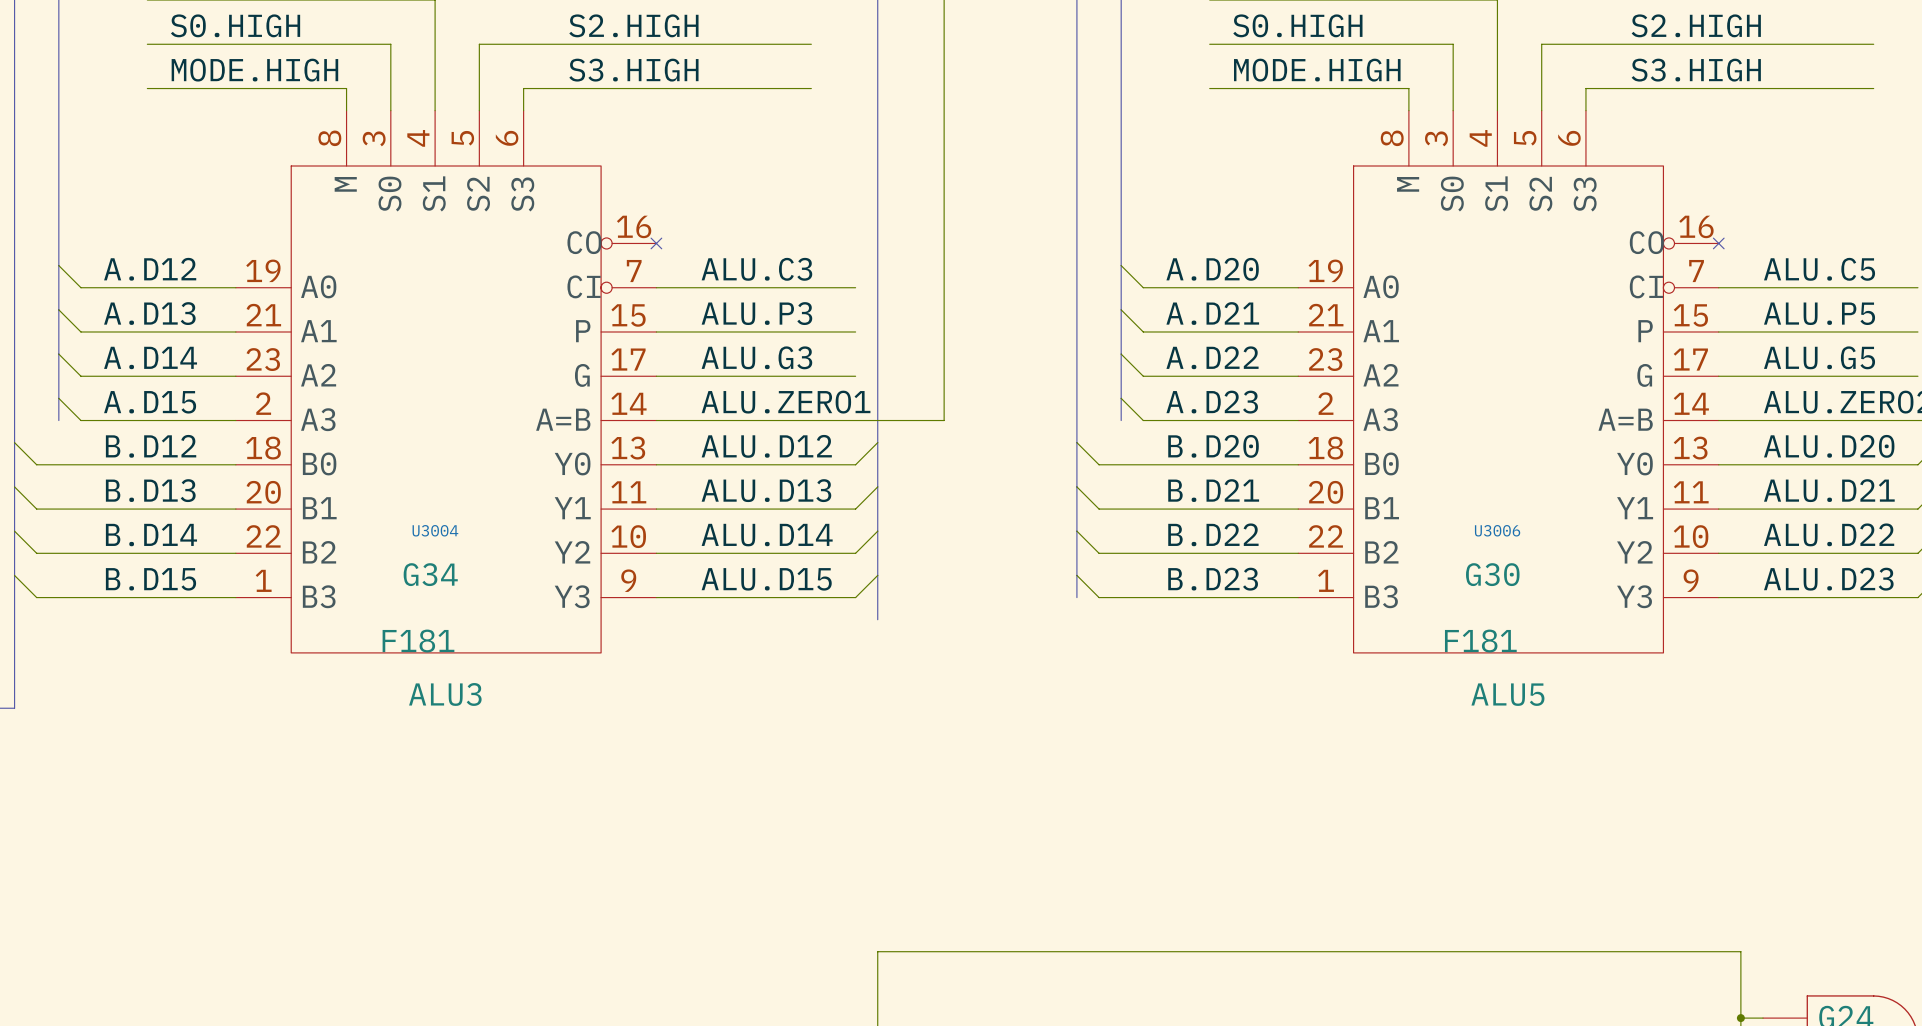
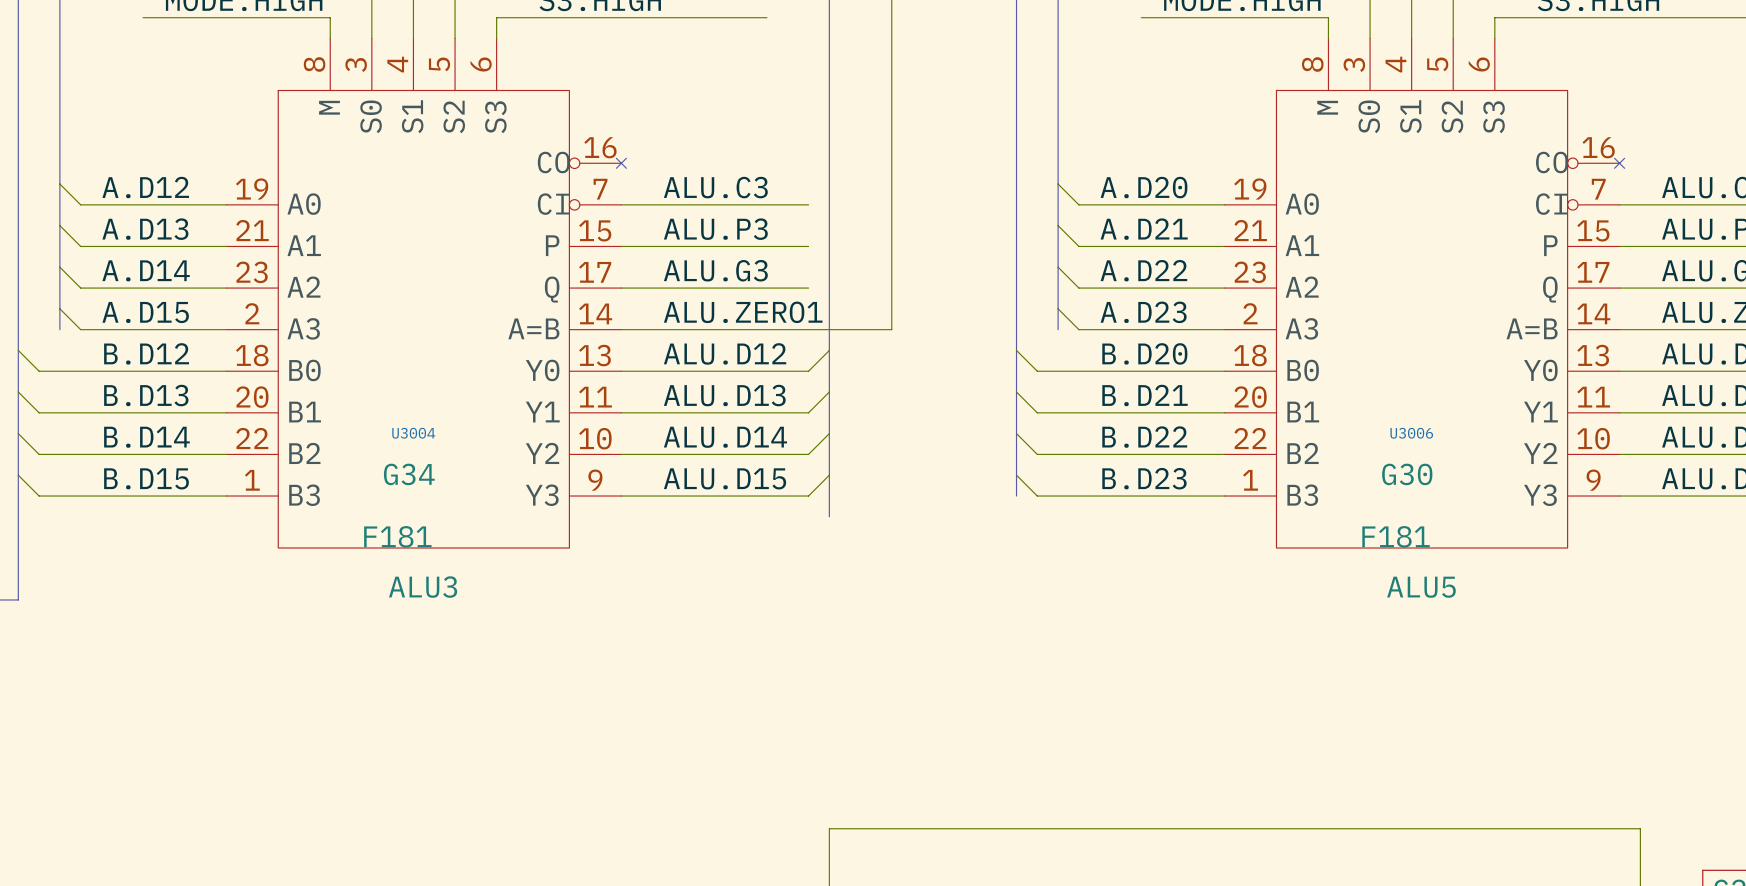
U3004 pin name: G (582, 375) -> Q (552, 289)
U3006 pin name: G (1644, 375) -> Q (1550, 289)

